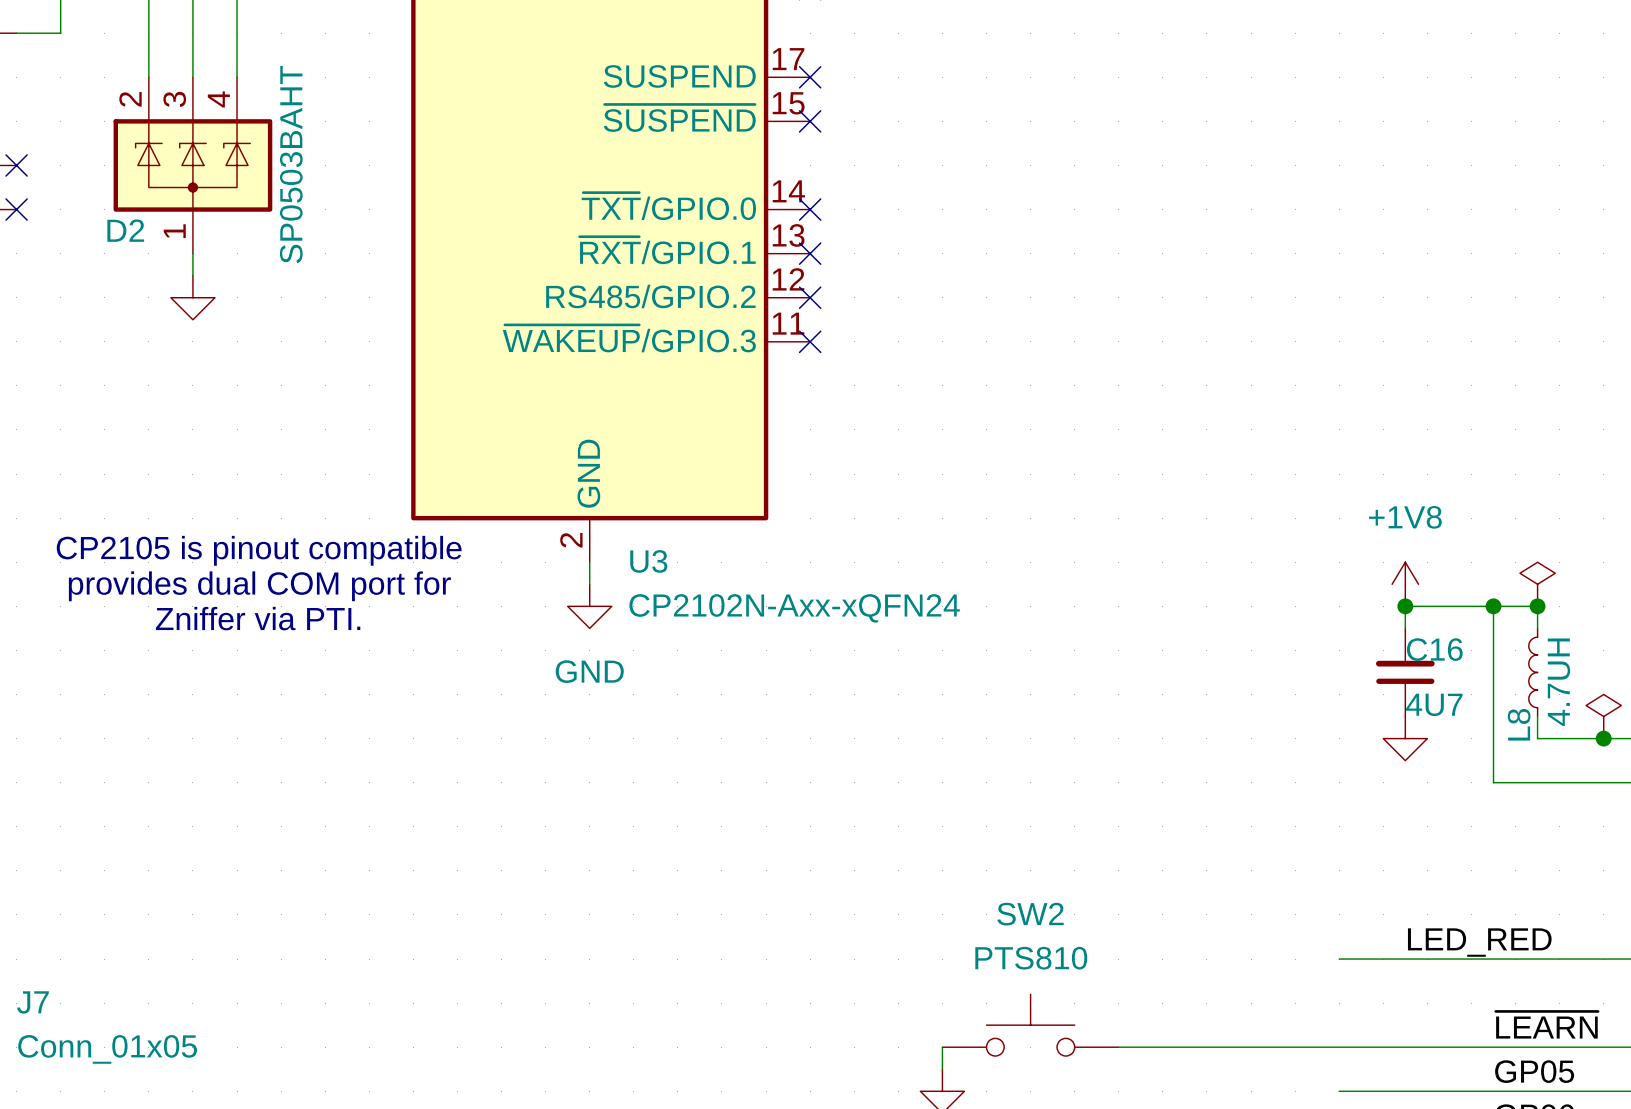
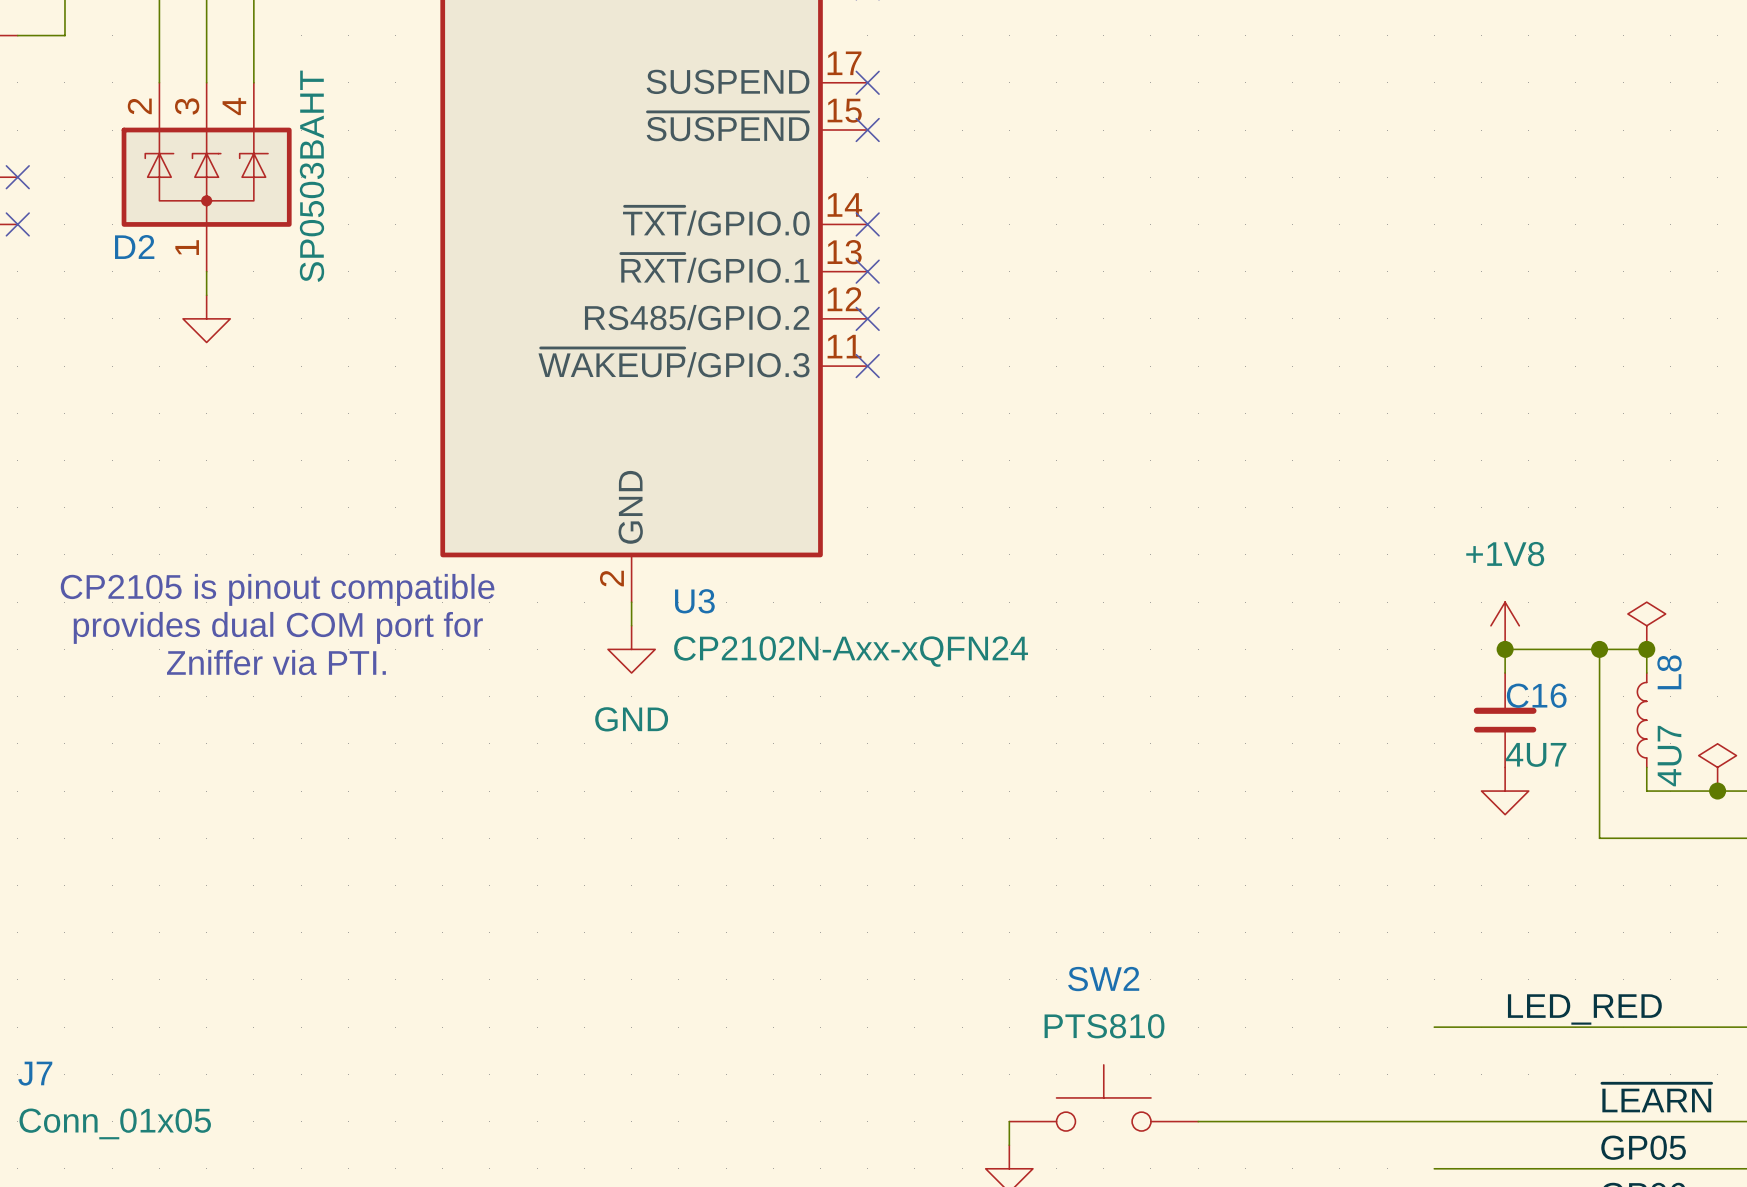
L8 value: 4.7UH (1558, 682) -> 4U7 (1669, 756)
L8 name position: L8 (1519, 724) -> L8 (1669, 672)

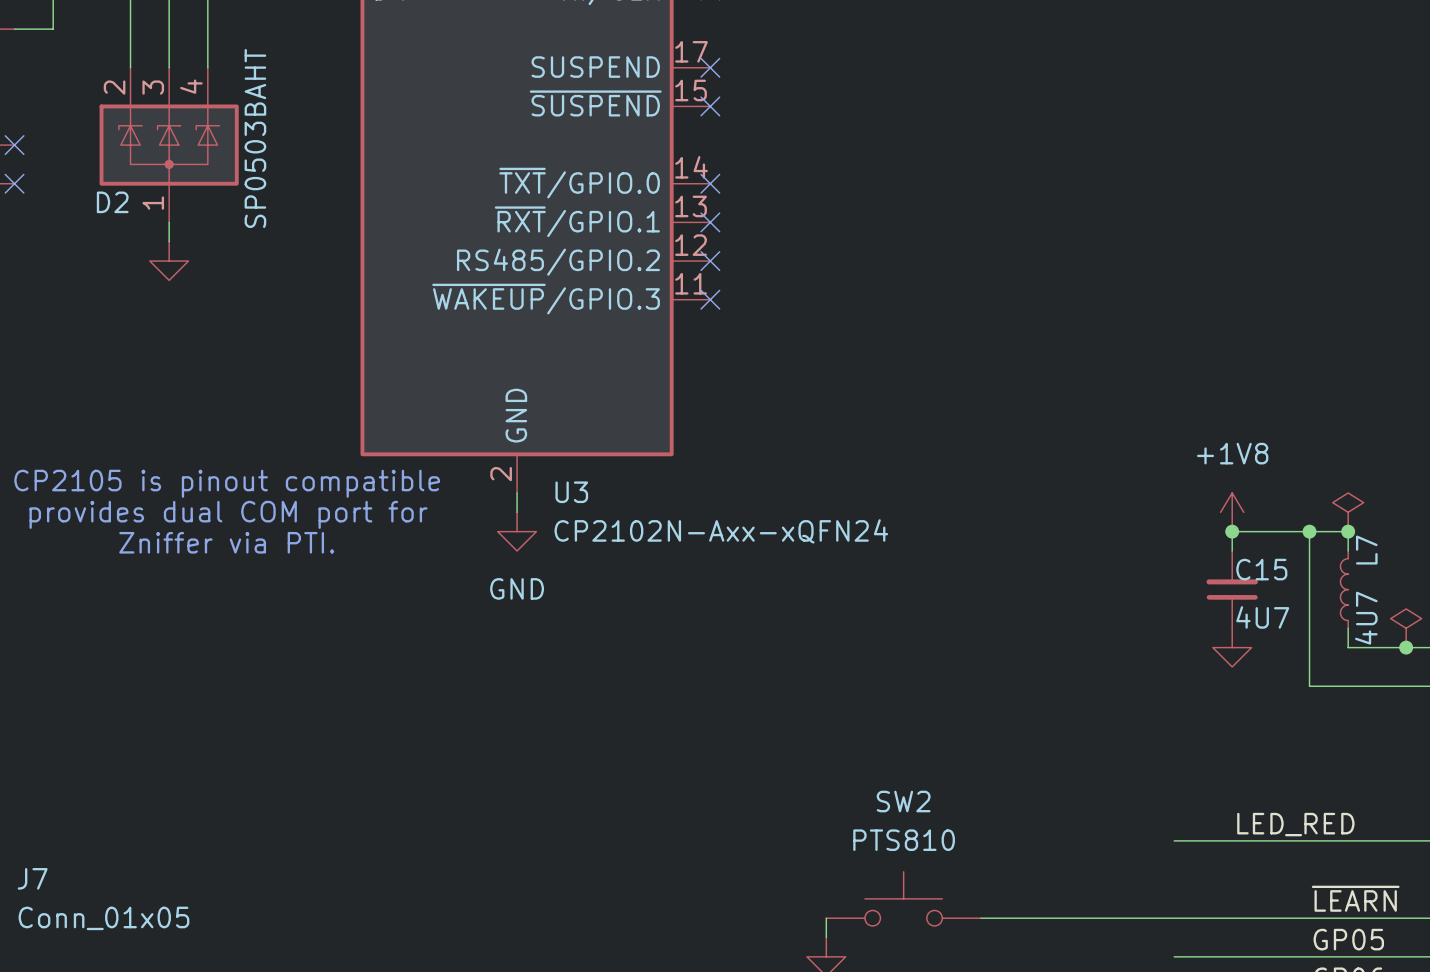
L8 name: L8 (1669, 672) -> L7 (1366, 550)
C16 name: C16 (1536, 695) -> C15 (1261, 569)

